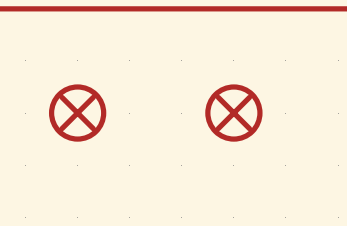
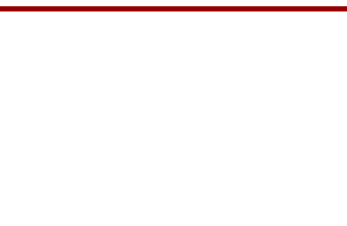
part: (77, 113) -> none
part: (233, 113) -> none

